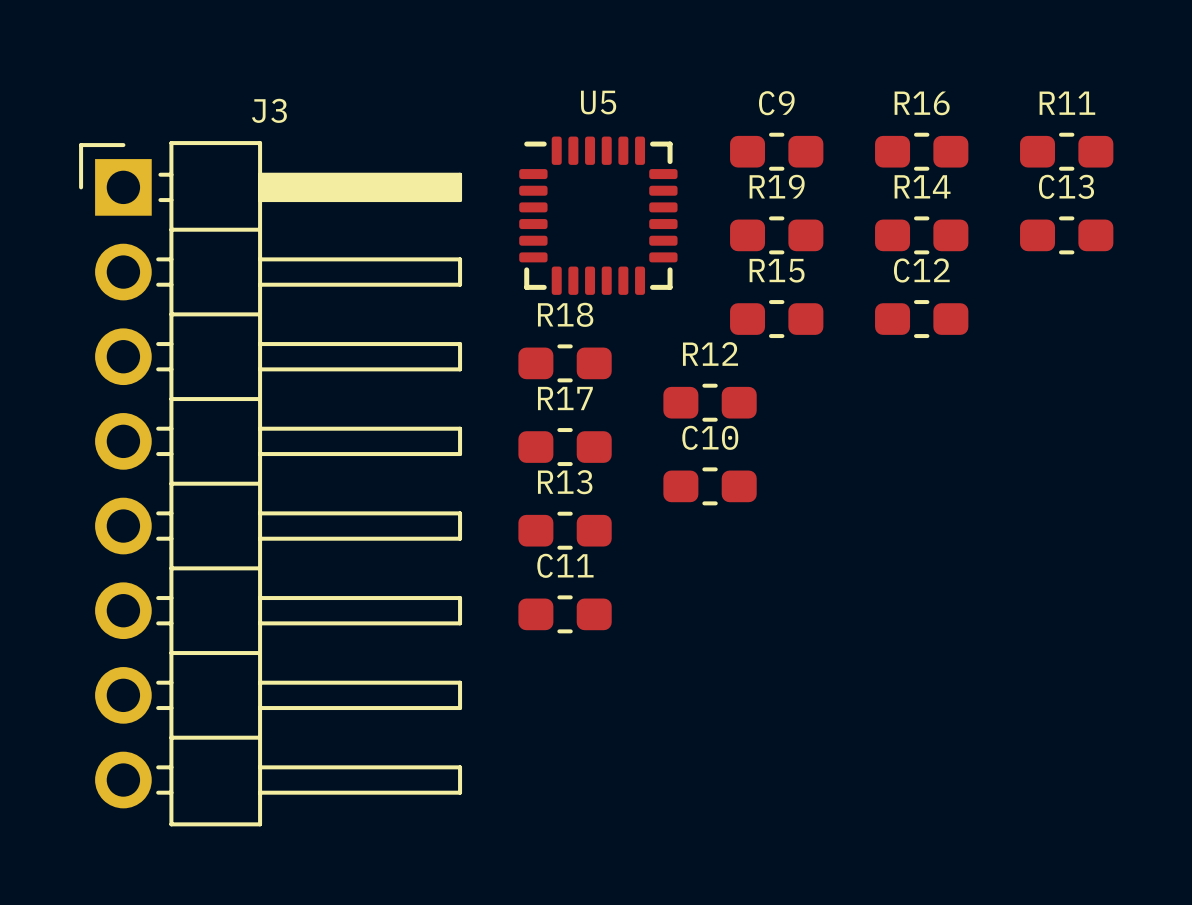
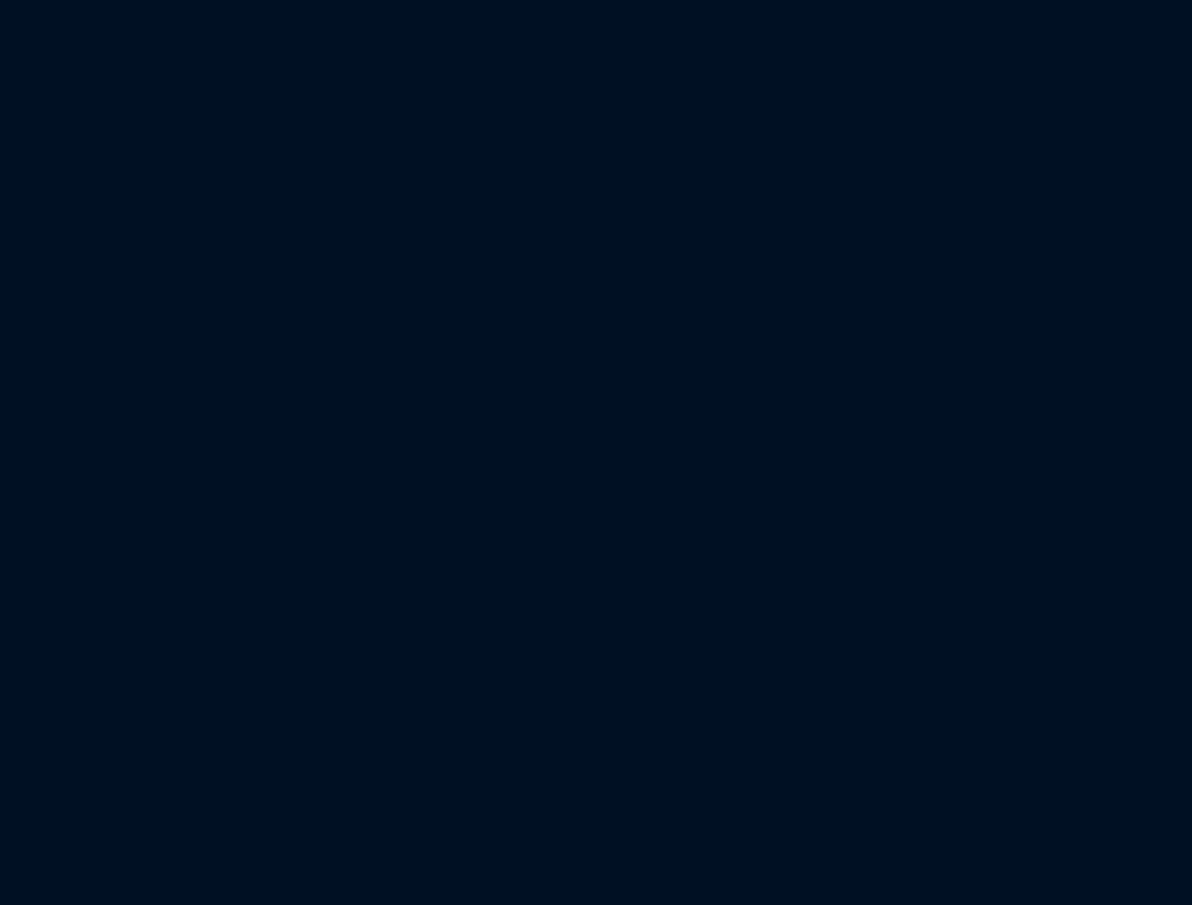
C9: (776, 151) -> none
R16: (921, 151) -> none
R11: (1066, 151) -> none
U5: (598, 215) -> none
R19: (776, 235) -> none
R14: (921, 235) -> none
C13: (1066, 235) -> none
R15: (776, 319) -> none
C12: (921, 319) -> none
R18: (565, 363) -> none
R12: (710, 402) -> none
R17: (565, 447) -> none
J3: (270, 483) -> none
C10: (710, 486) -> none
R13: (565, 530) -> none
C11: (565, 614) -> none

